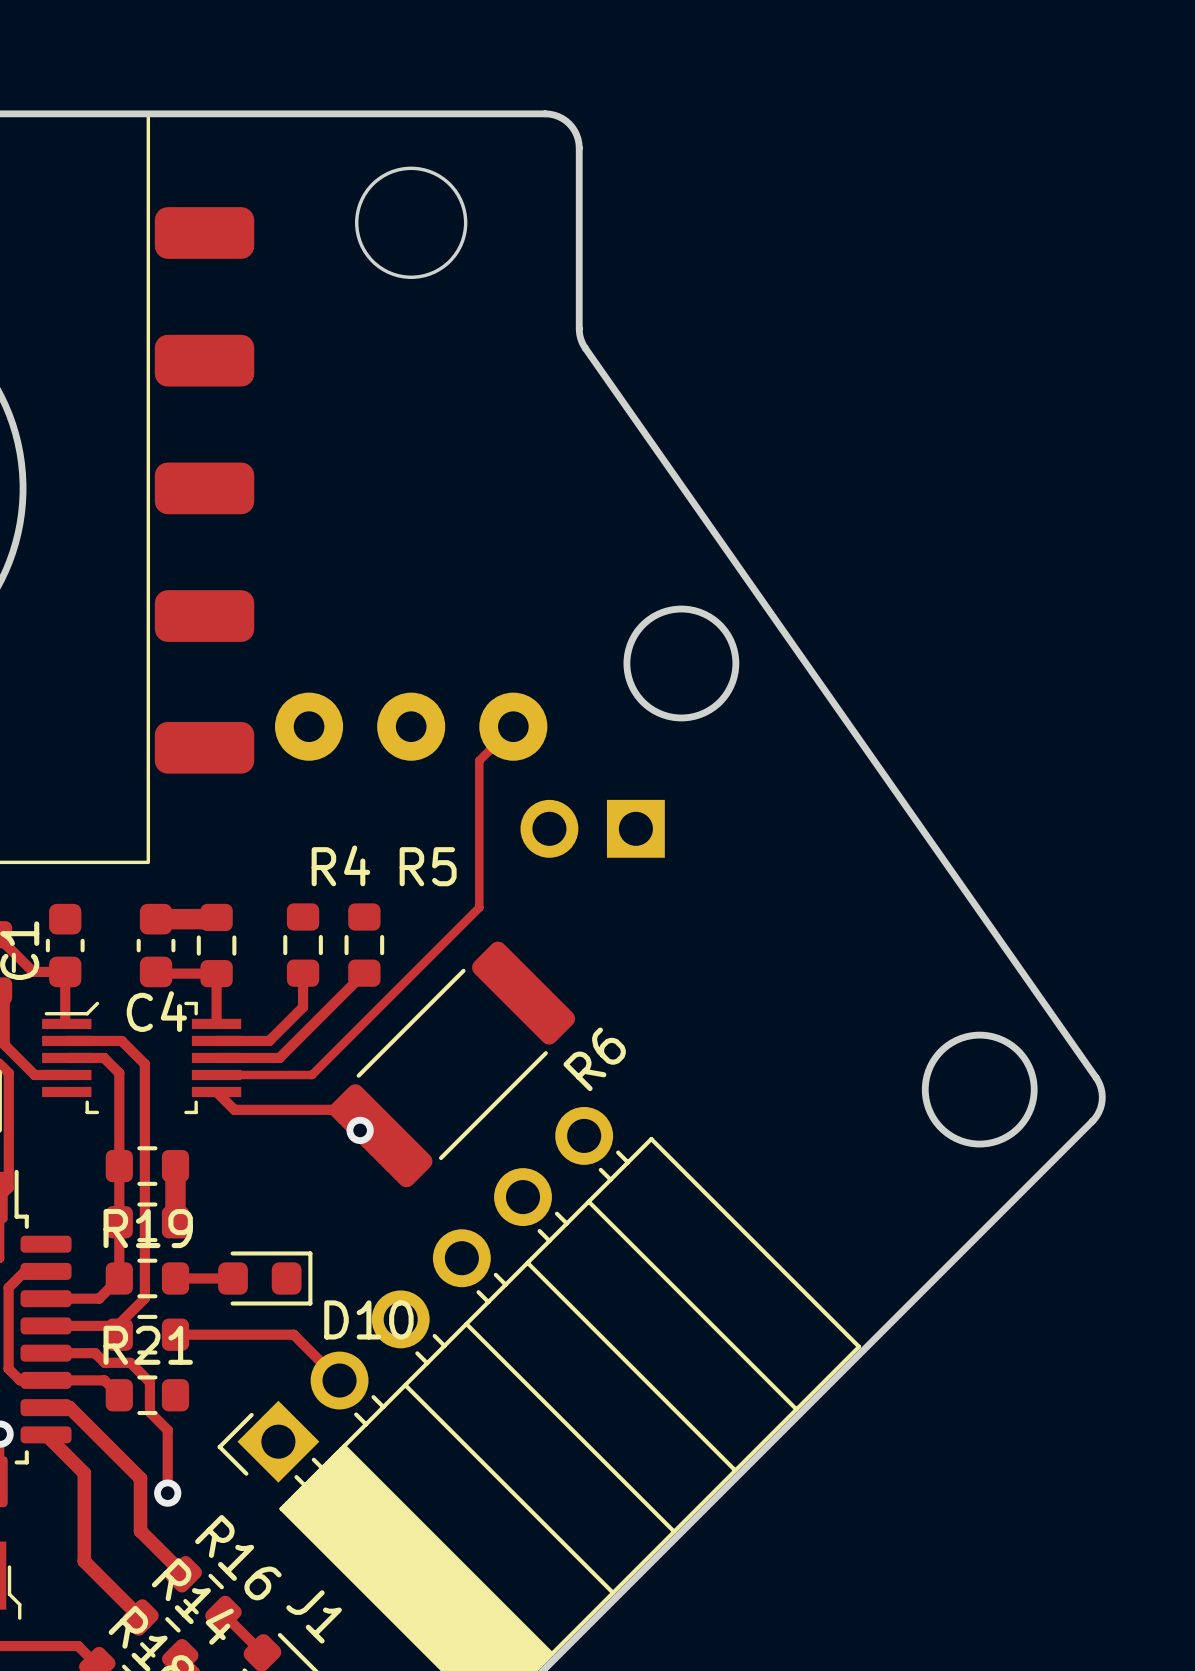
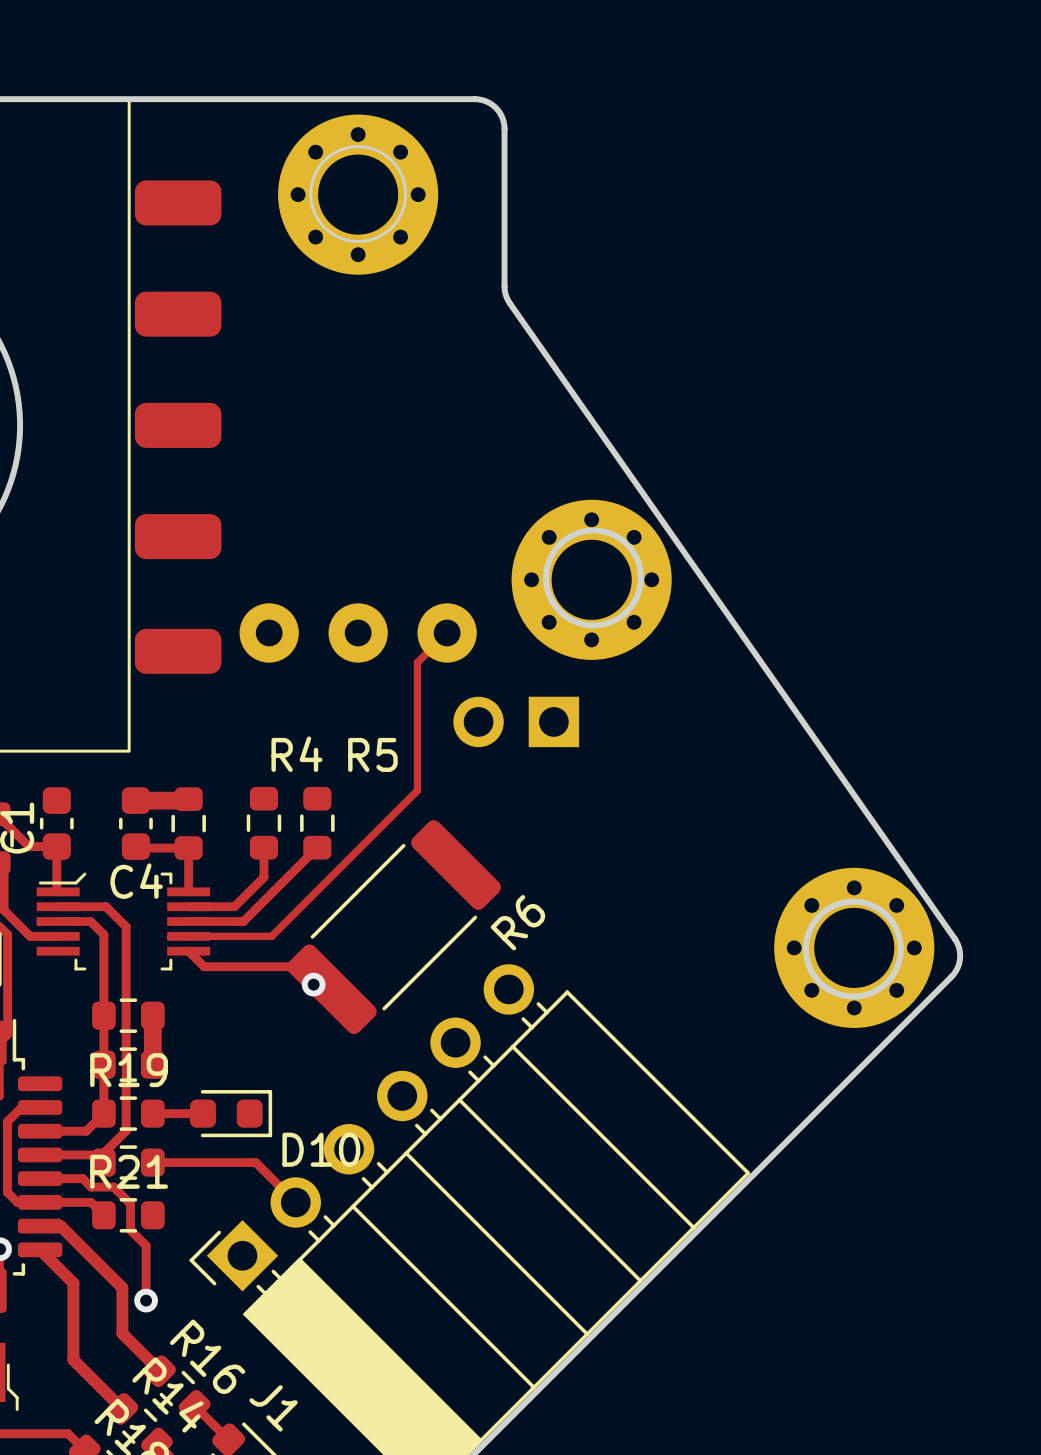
part: none -> (358, 194)
part: none -> (591, 579)
part: none -> (854, 947)

